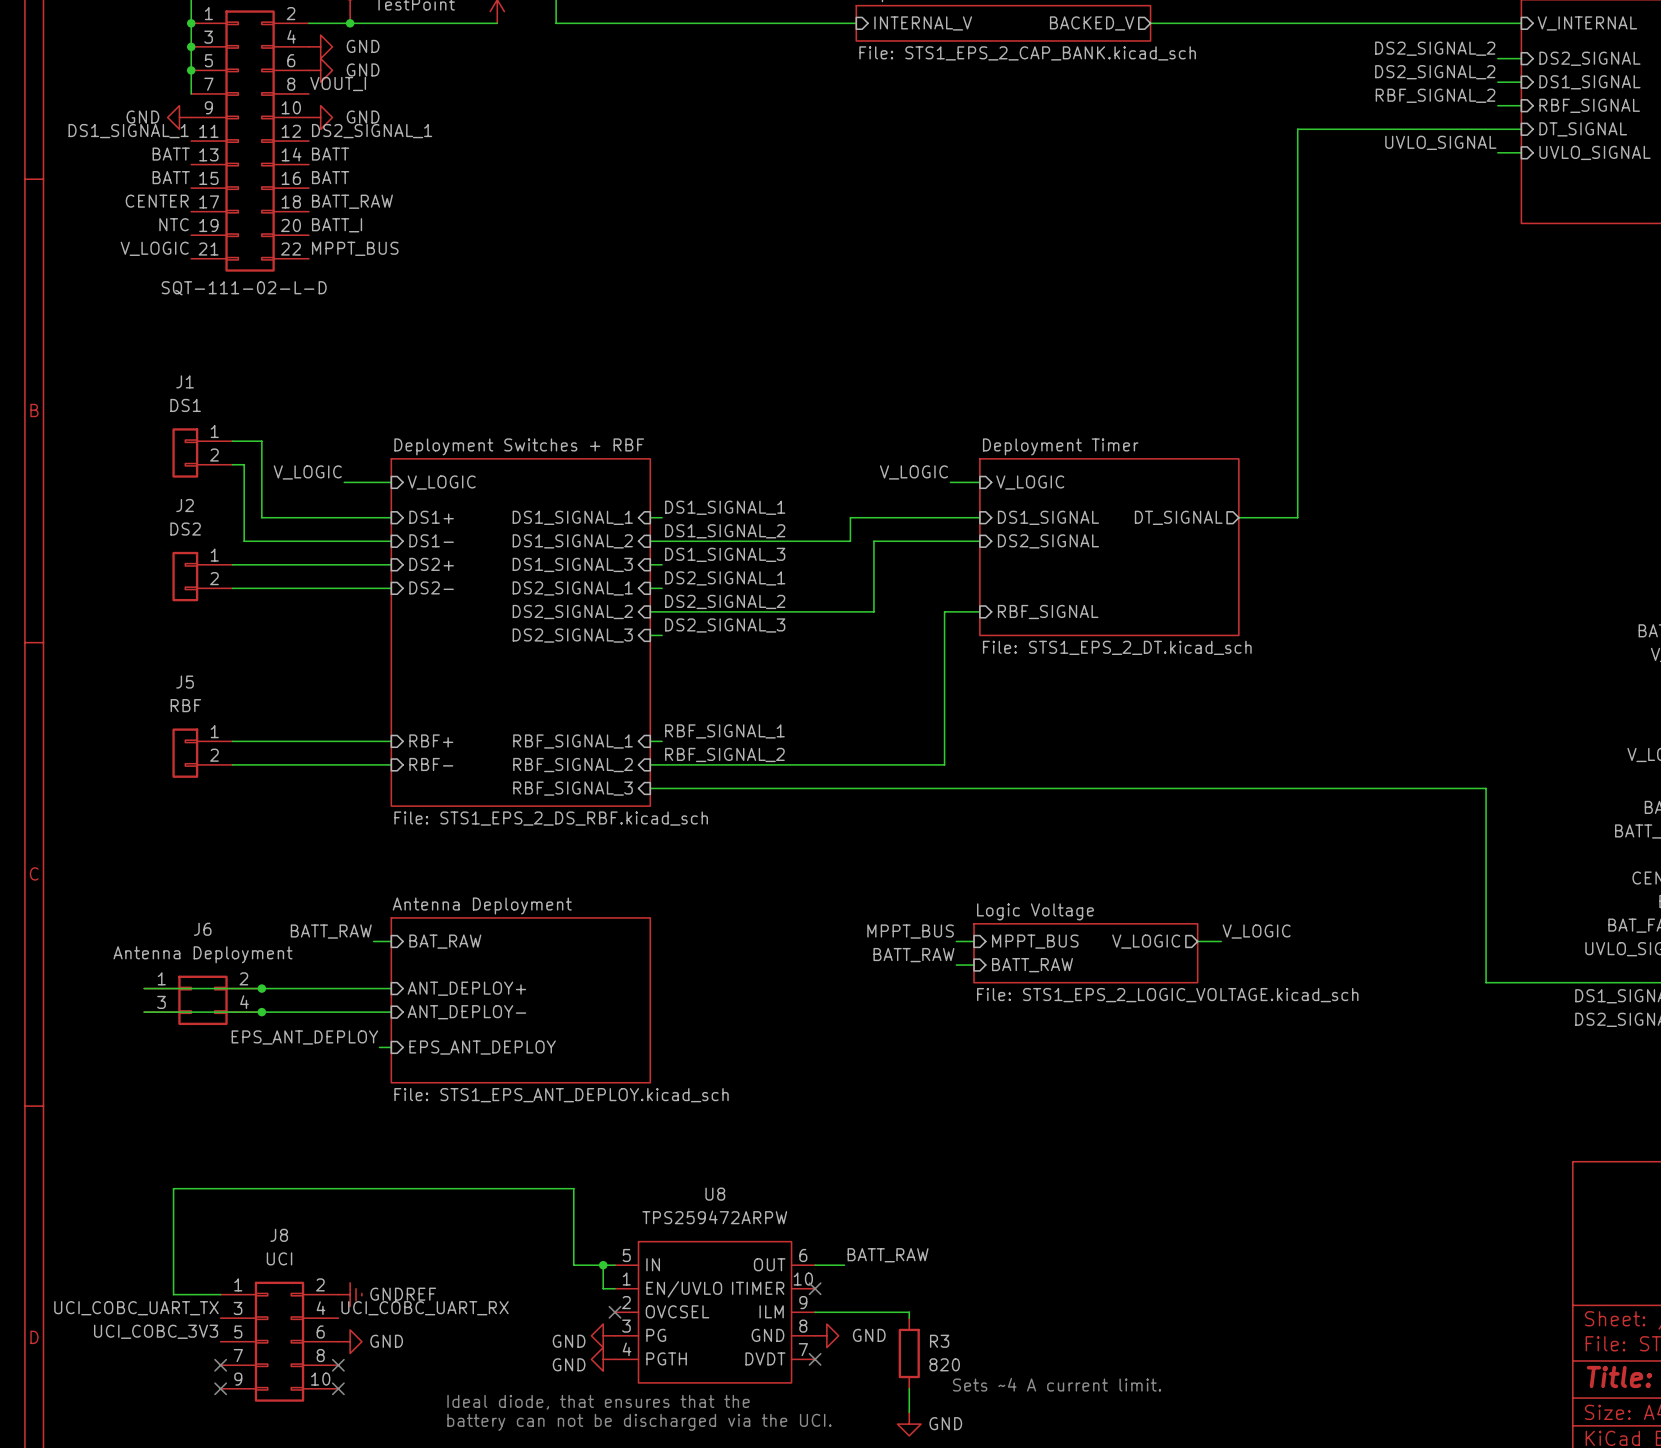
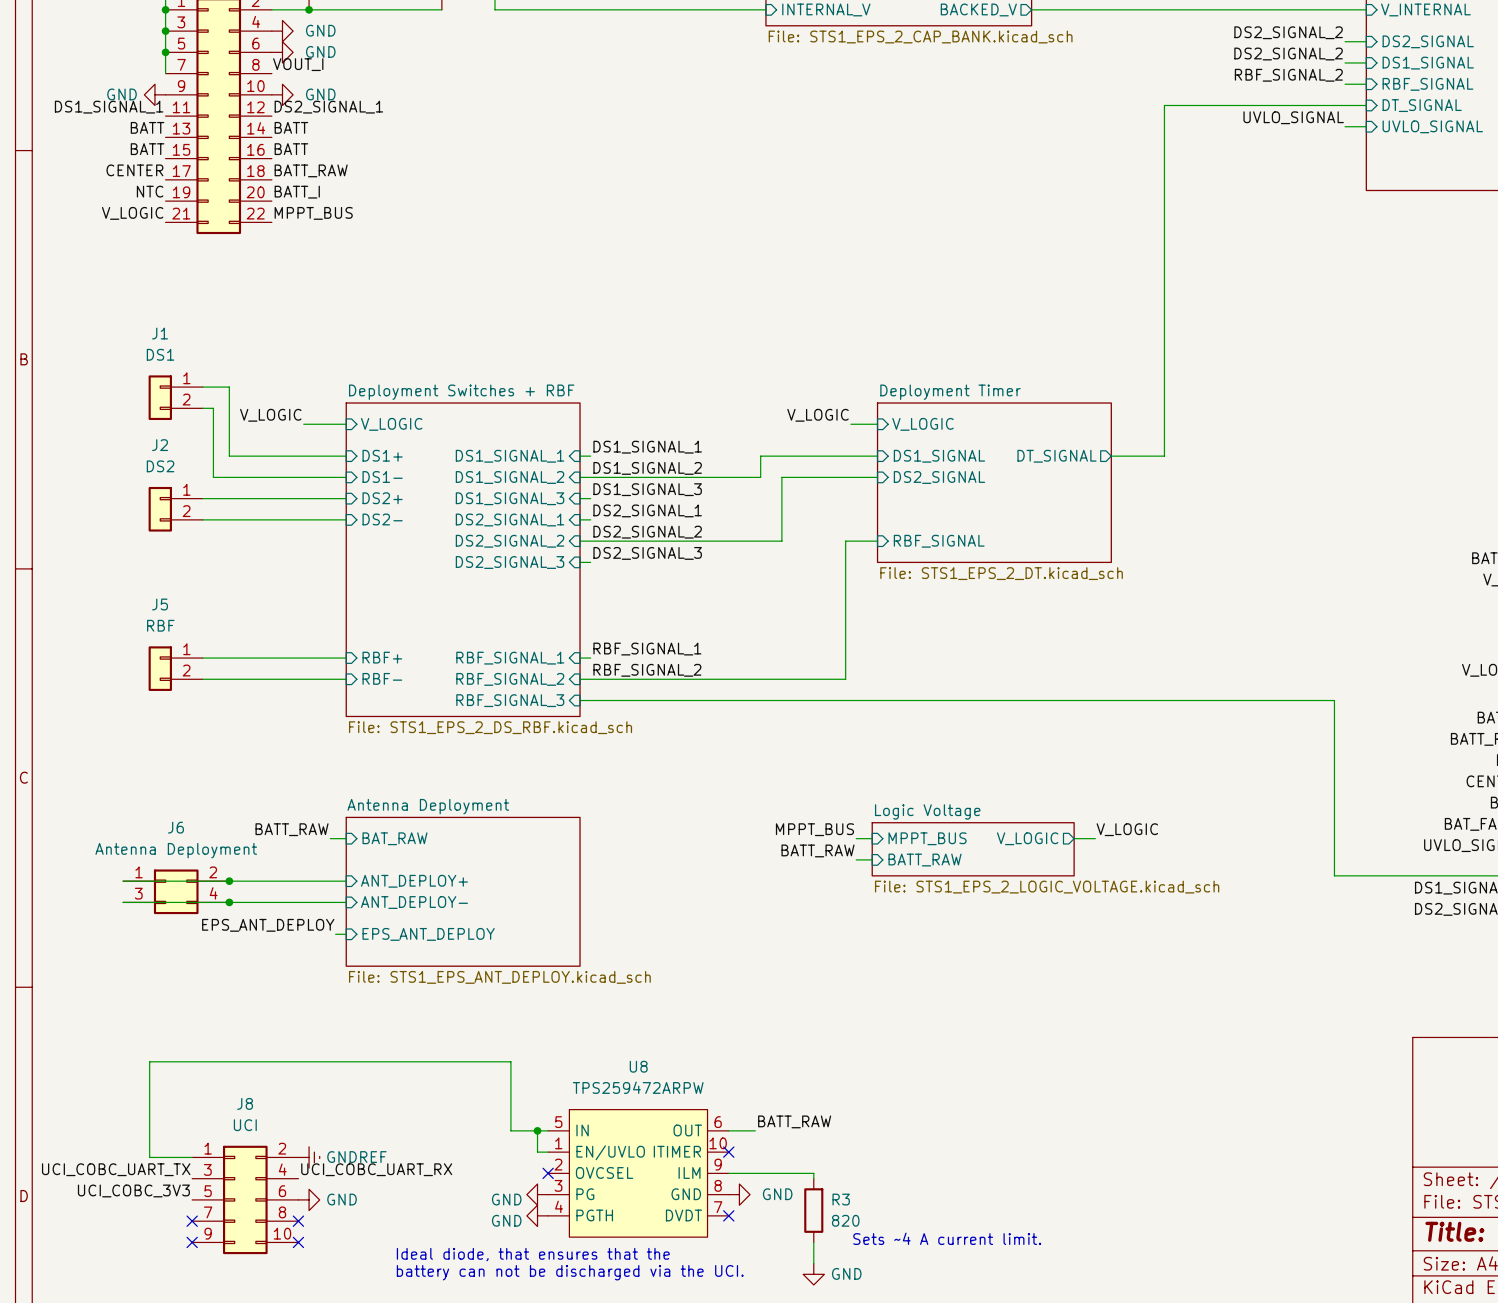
part text: SQT-111-02-L-D (244, 288) -> none

